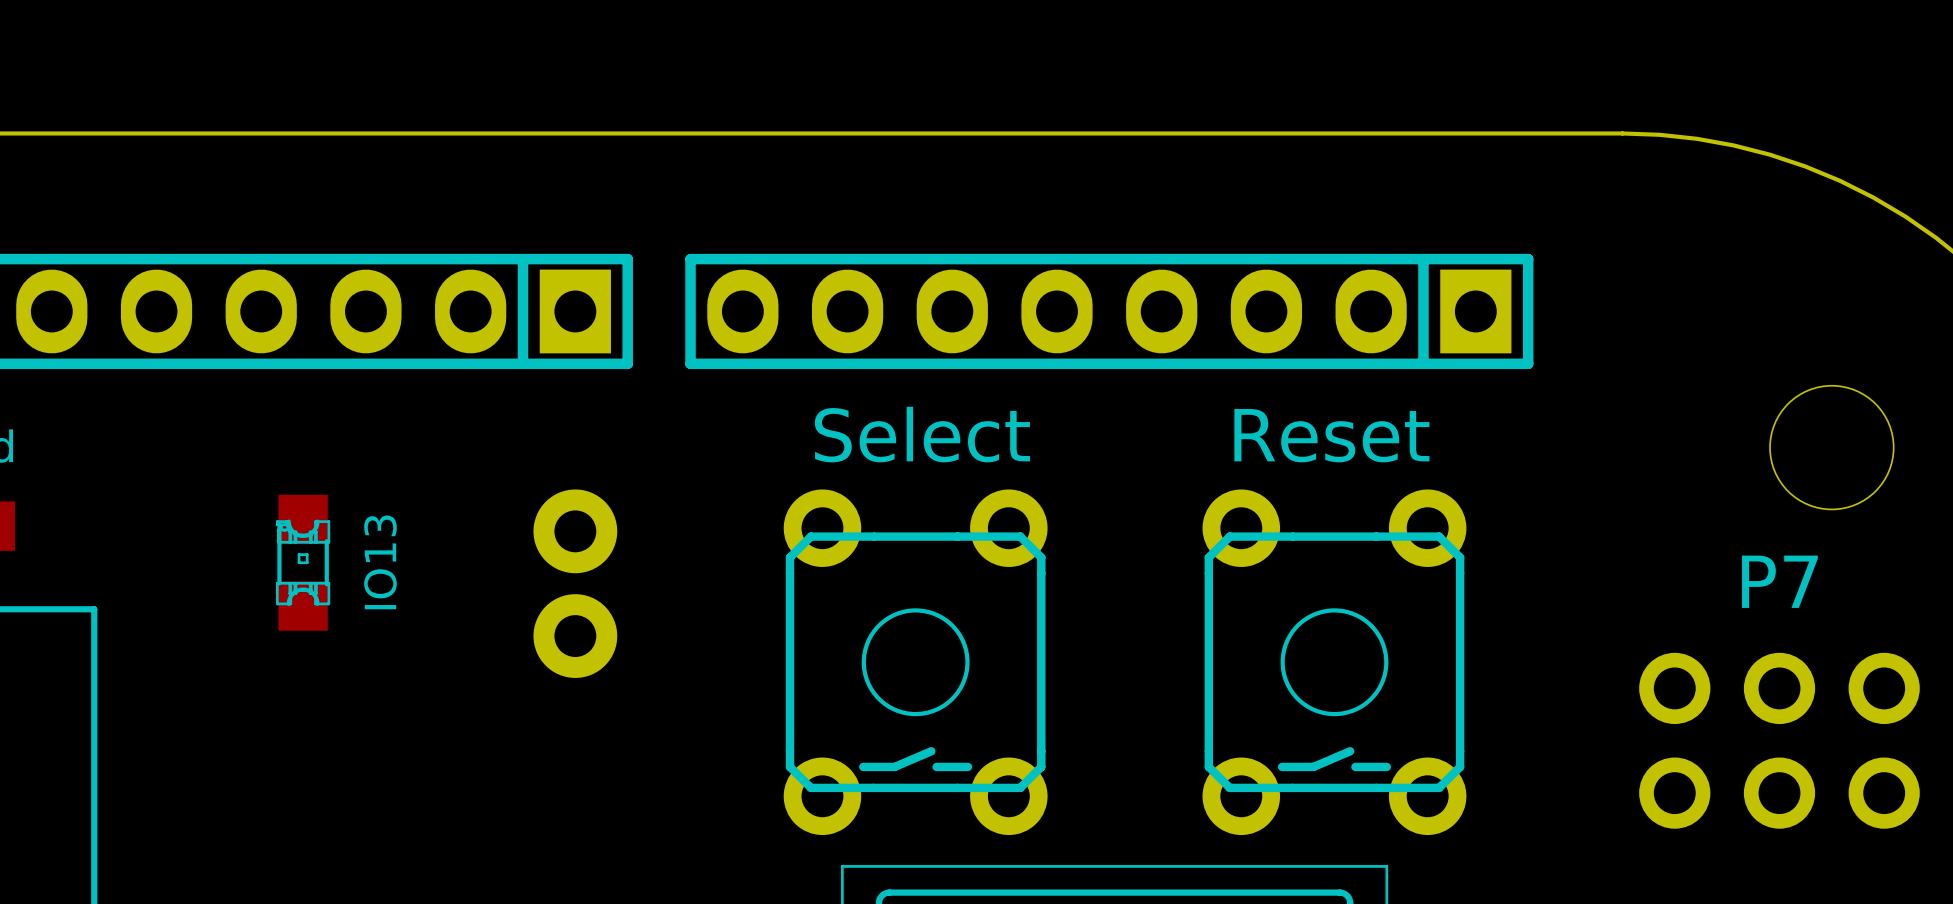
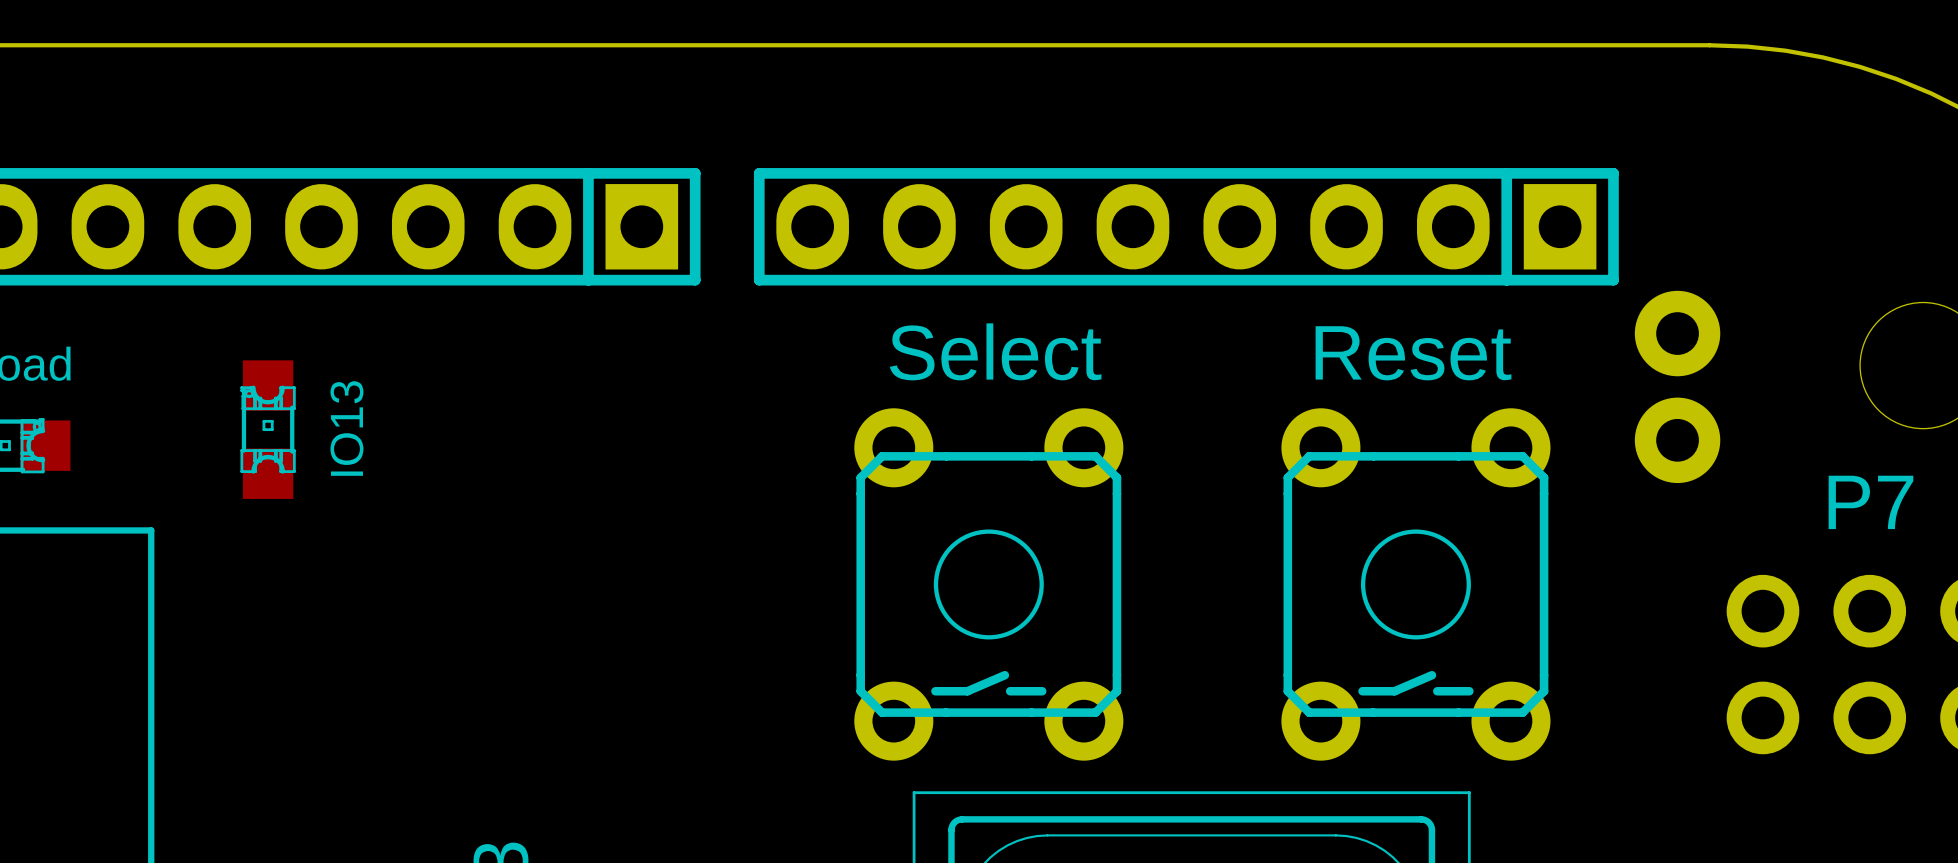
part position: (303, 562) -> (268, 429)
part position: (575, 583) -> (1677, 386)

